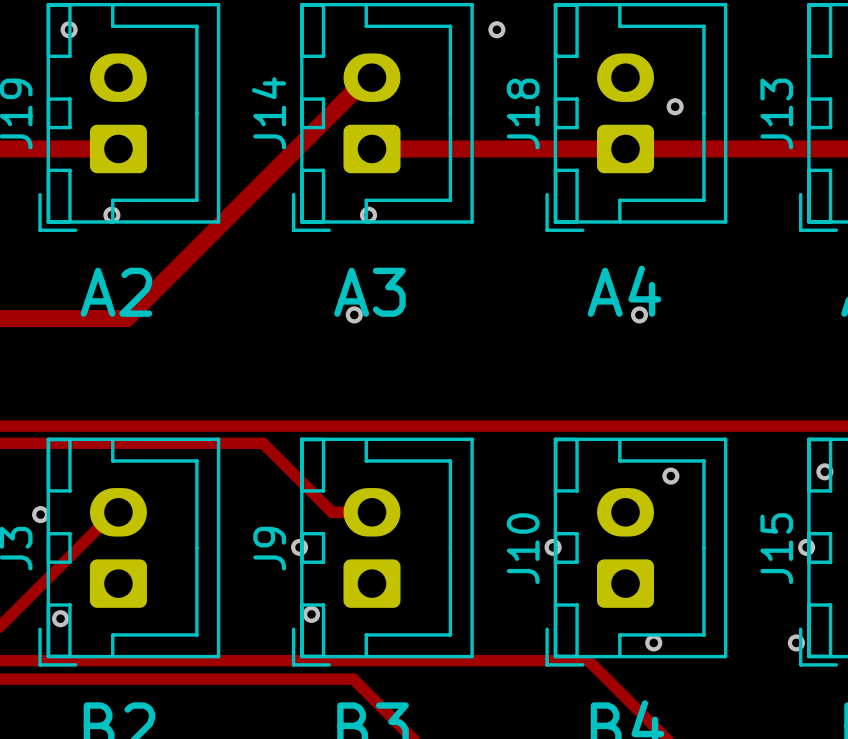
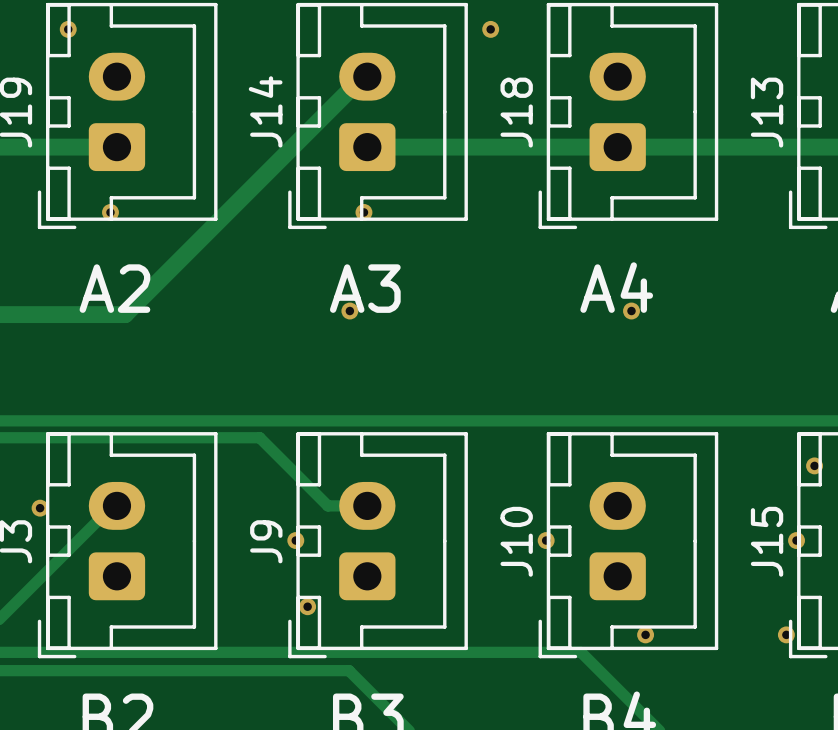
via: (675, 106) -> none
via: (670, 476) -> none
via: (60, 618) -> none

